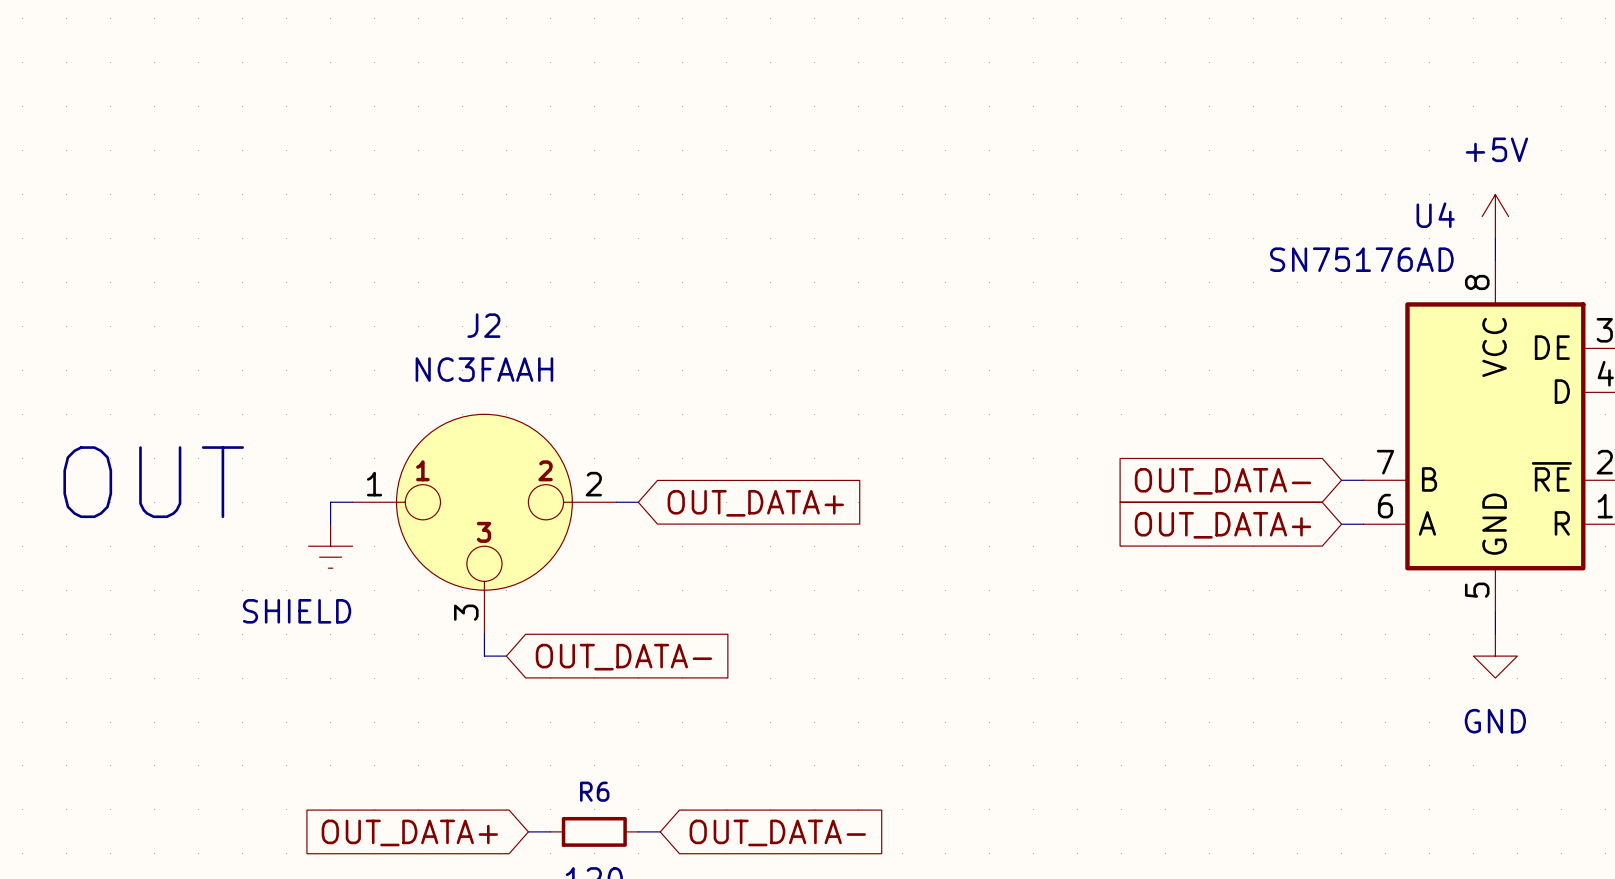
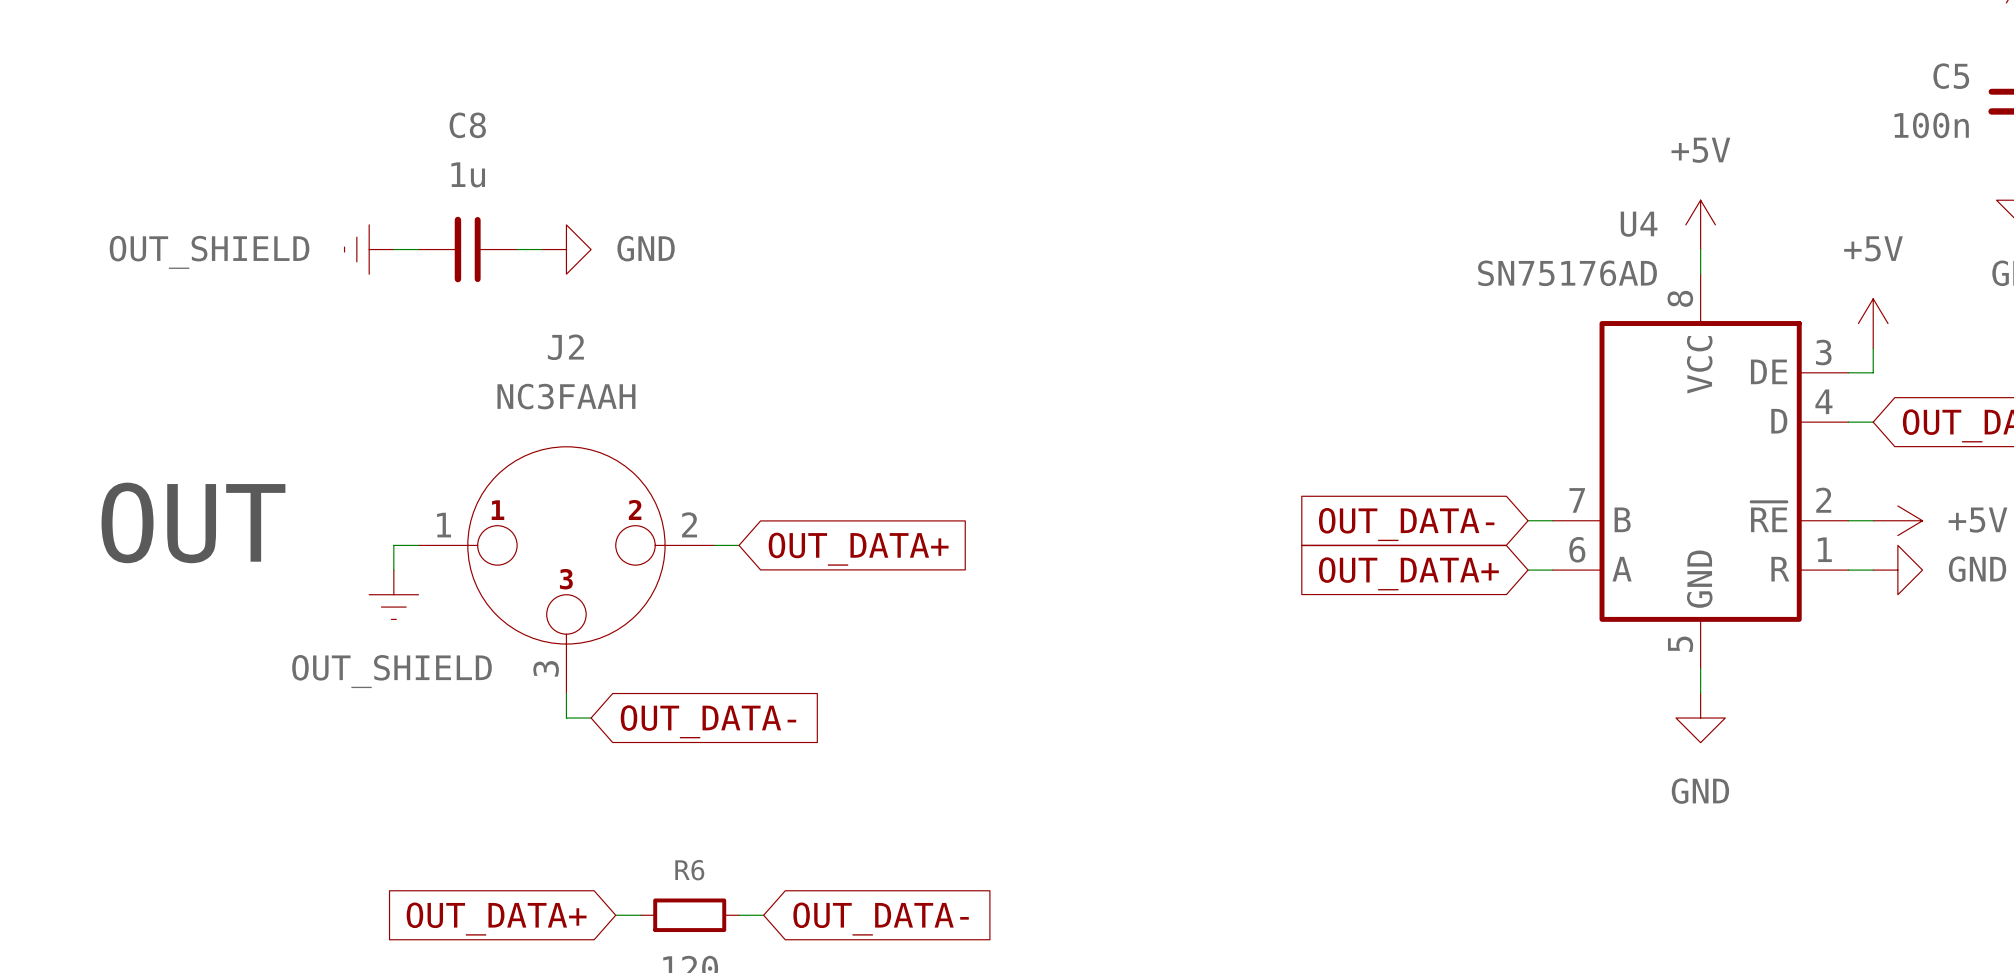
power symbol: none -> OUT_SHIELD (369, 249)
wire: none -> (393, 249) (418, 249)
C8: none -> 1u (467, 249)
wire: none -> (517, 249) (541, 249)
power symbol: none -> GND (566, 249)
power symbol: SHIELD (330, 546) -> OUT_SHIELD (393, 594)

